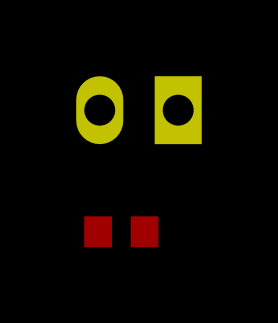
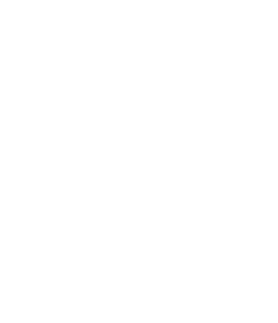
part: (138, 110) -> none
part: (121, 231) -> none

